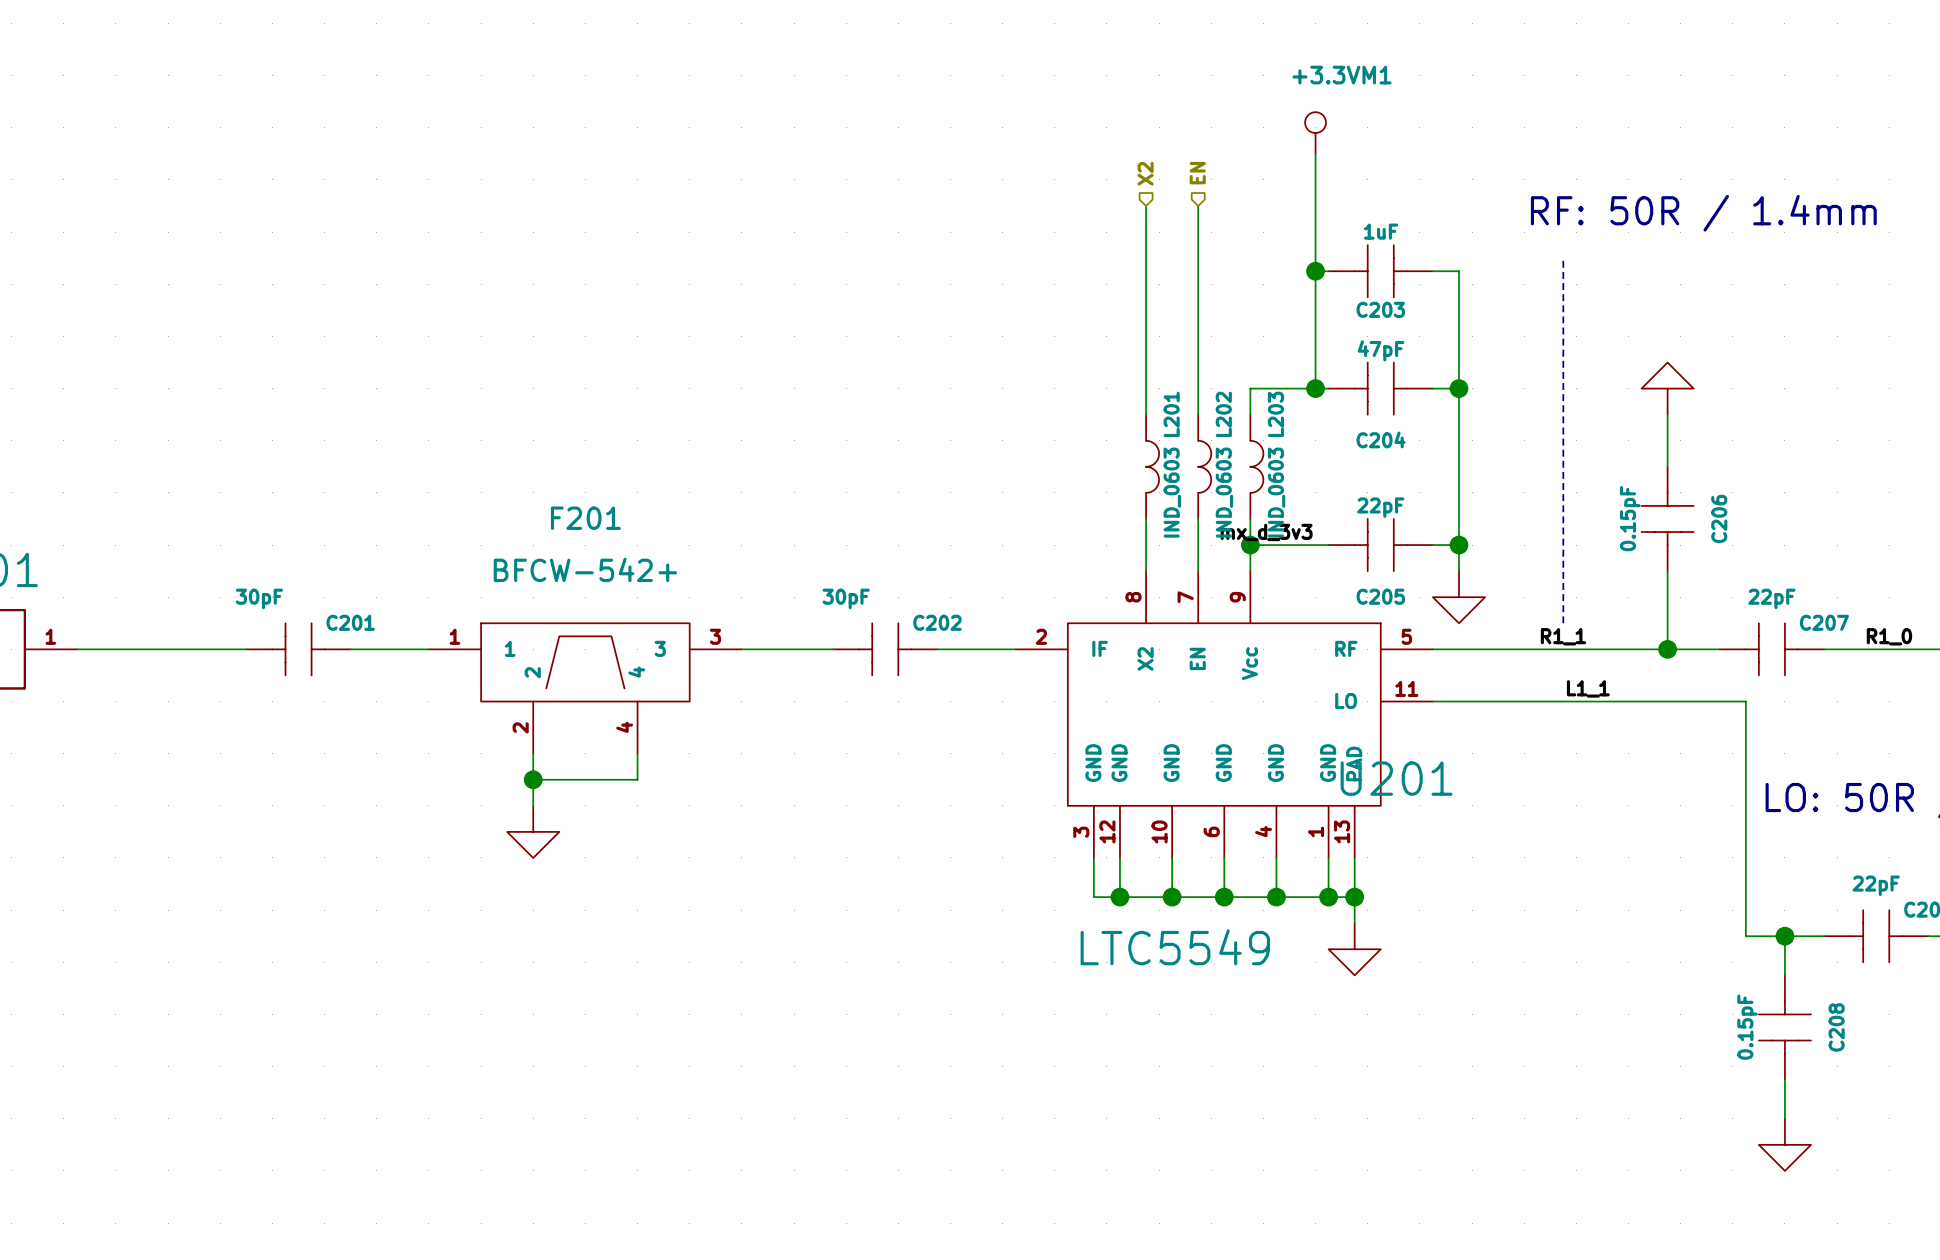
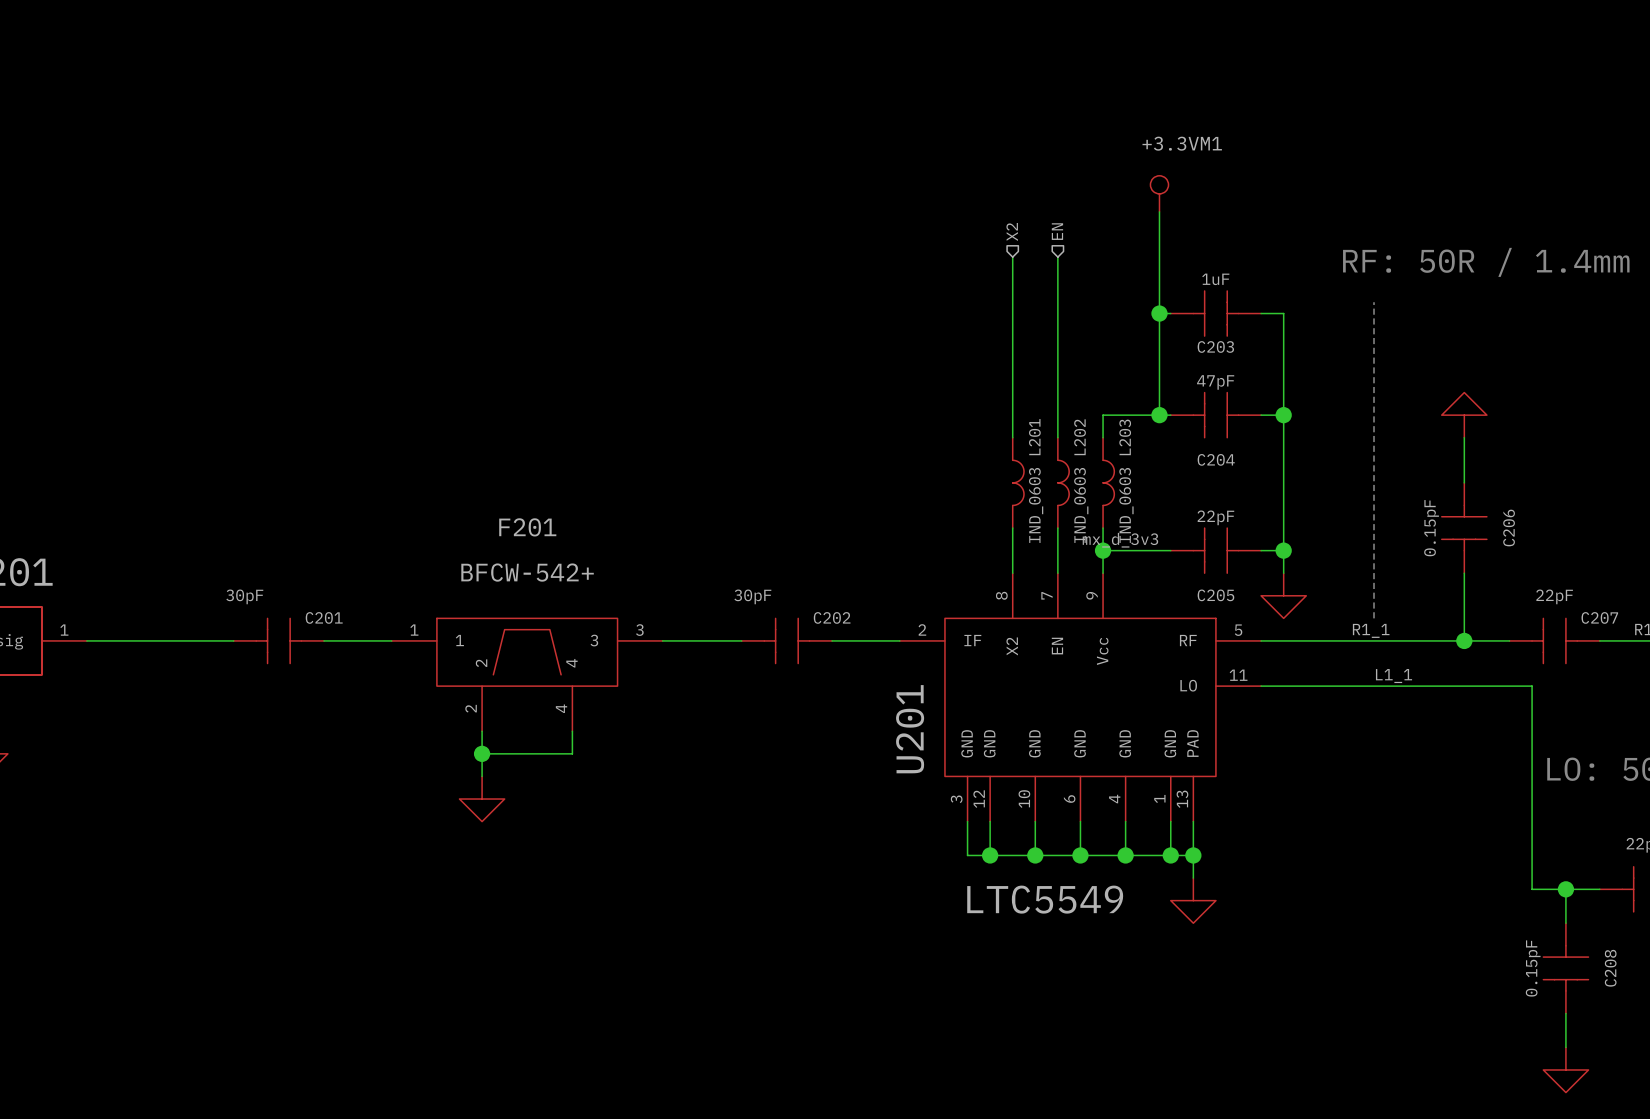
U201 name rotation: 0° (1396, 778) -> 90° counterclockwise (910, 729)
U201 name position: U201 (1396, 778) -> U201 (910, 729)

